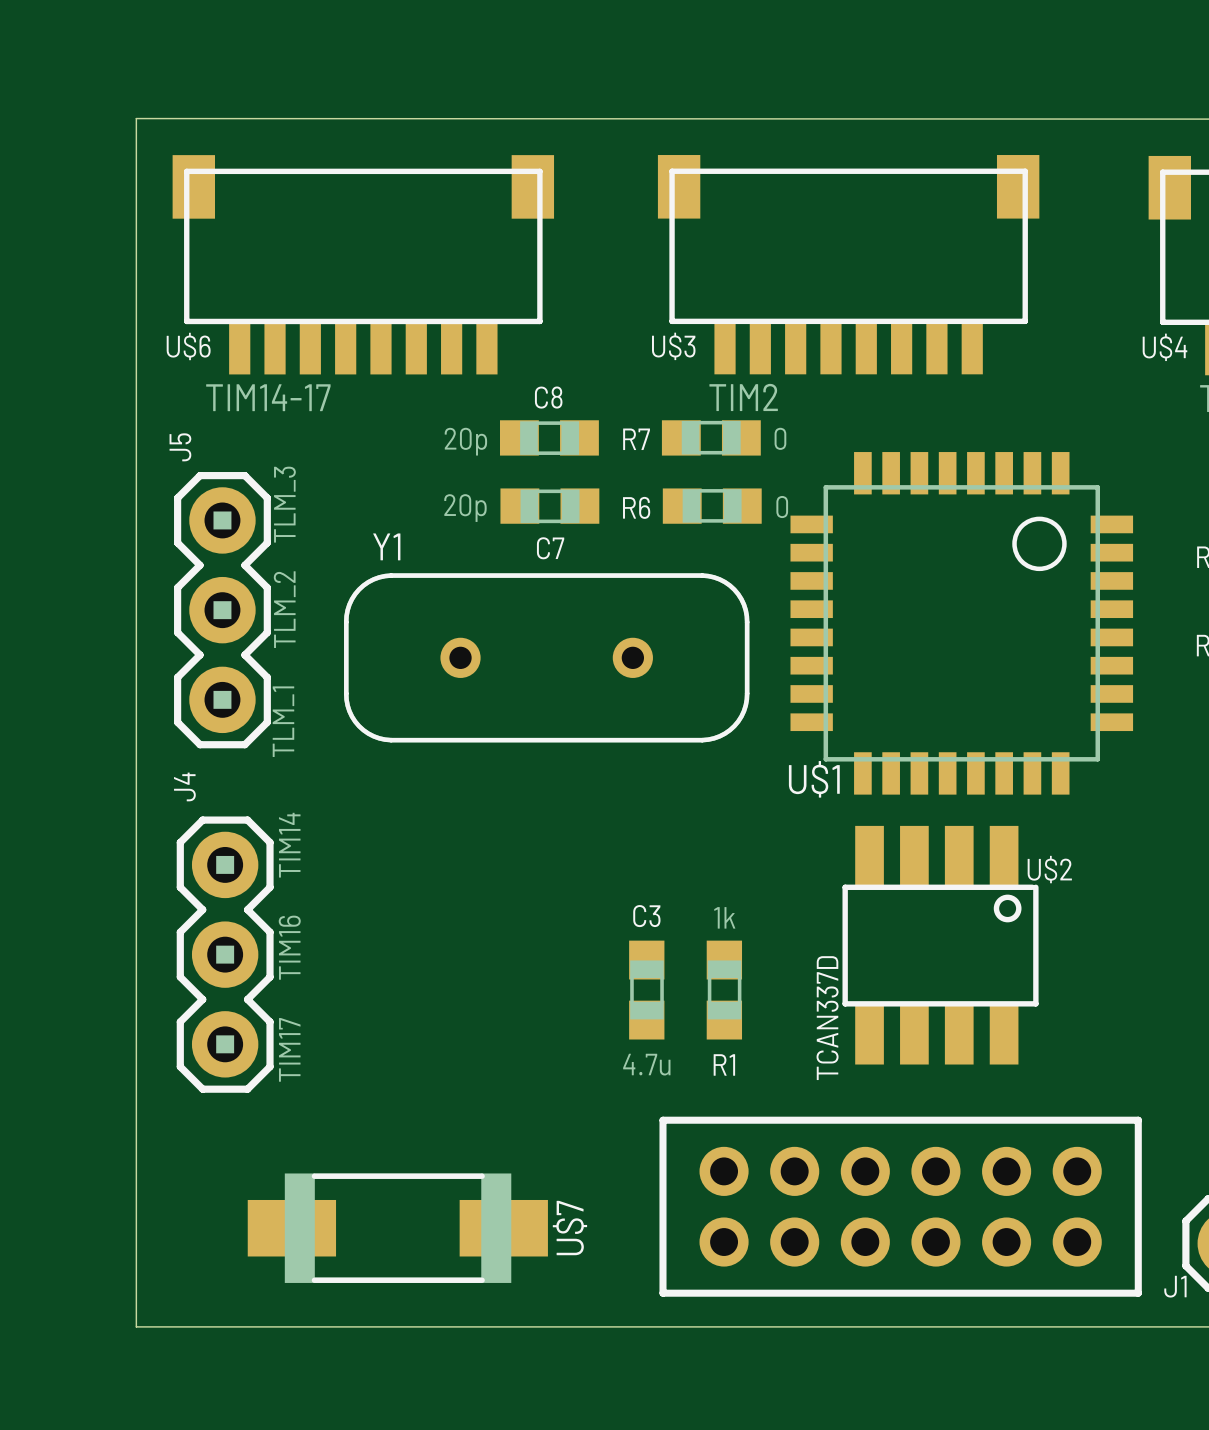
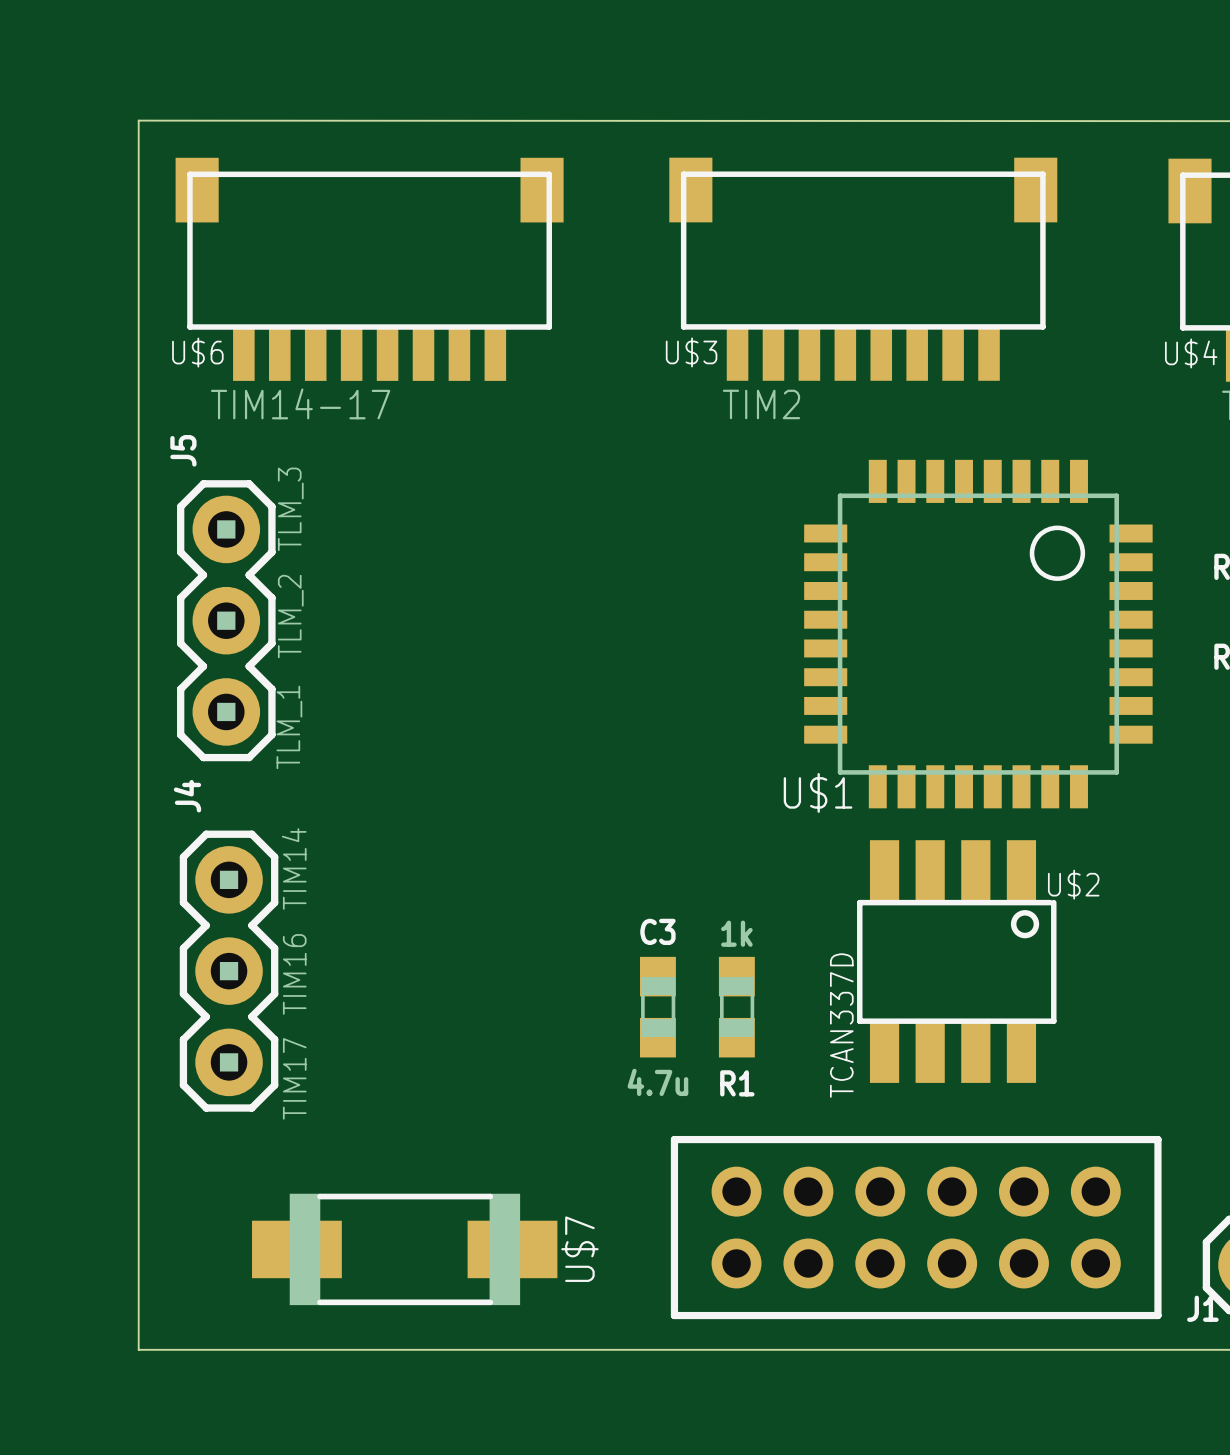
C8: 20p (549, 437) -> none
R7: 0 (711, 437) -> none
C7: 20p (549, 506) -> none
R6: 0 (712, 506) -> none
Y1: (546, 657) -> none

